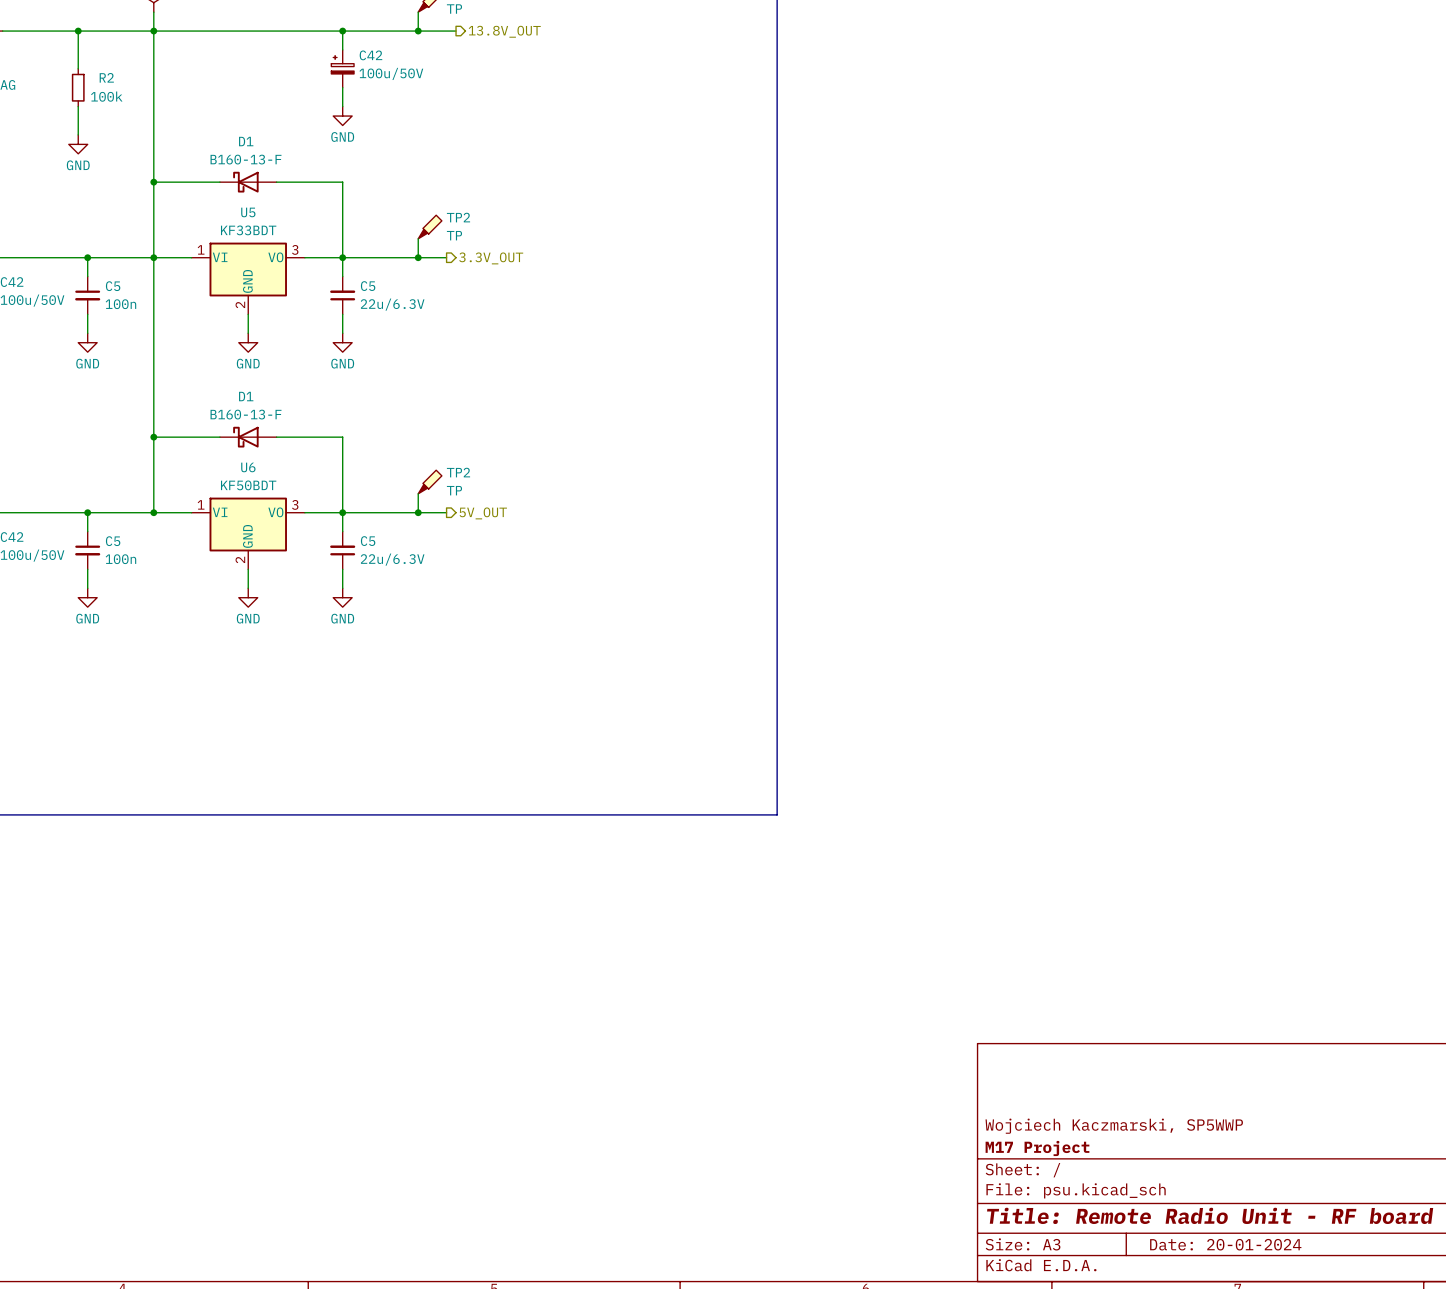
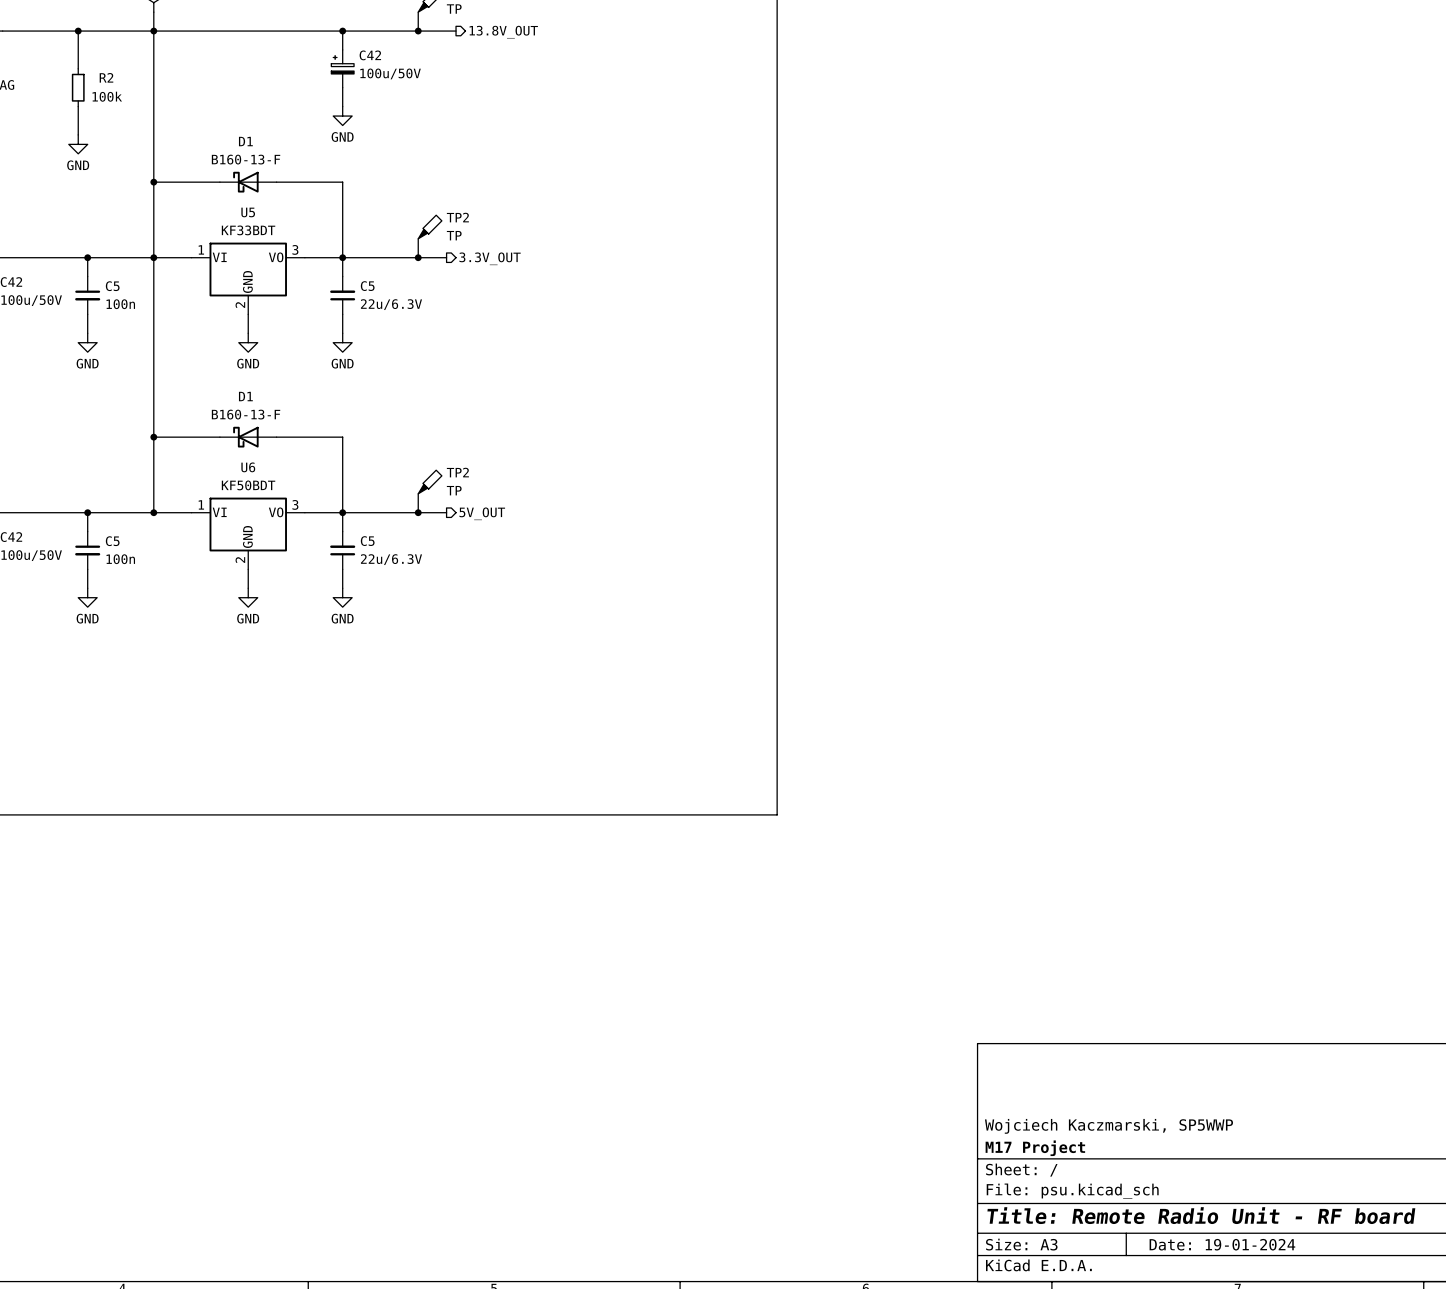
title block: Date: 20-01-2024 (1225, 1244) -> Date: 19-01-2024 (1222, 1244)

